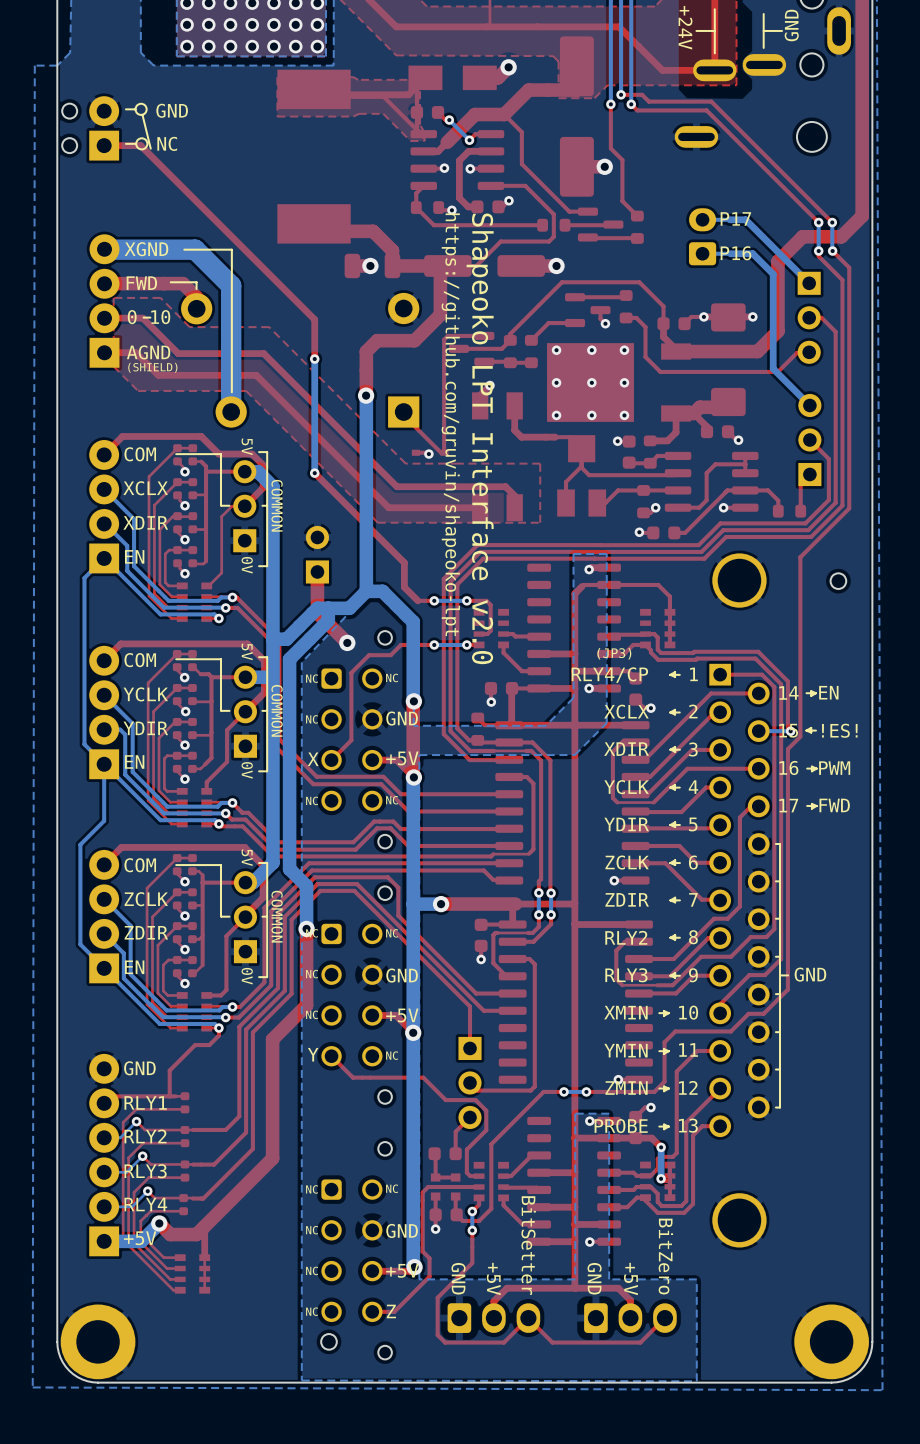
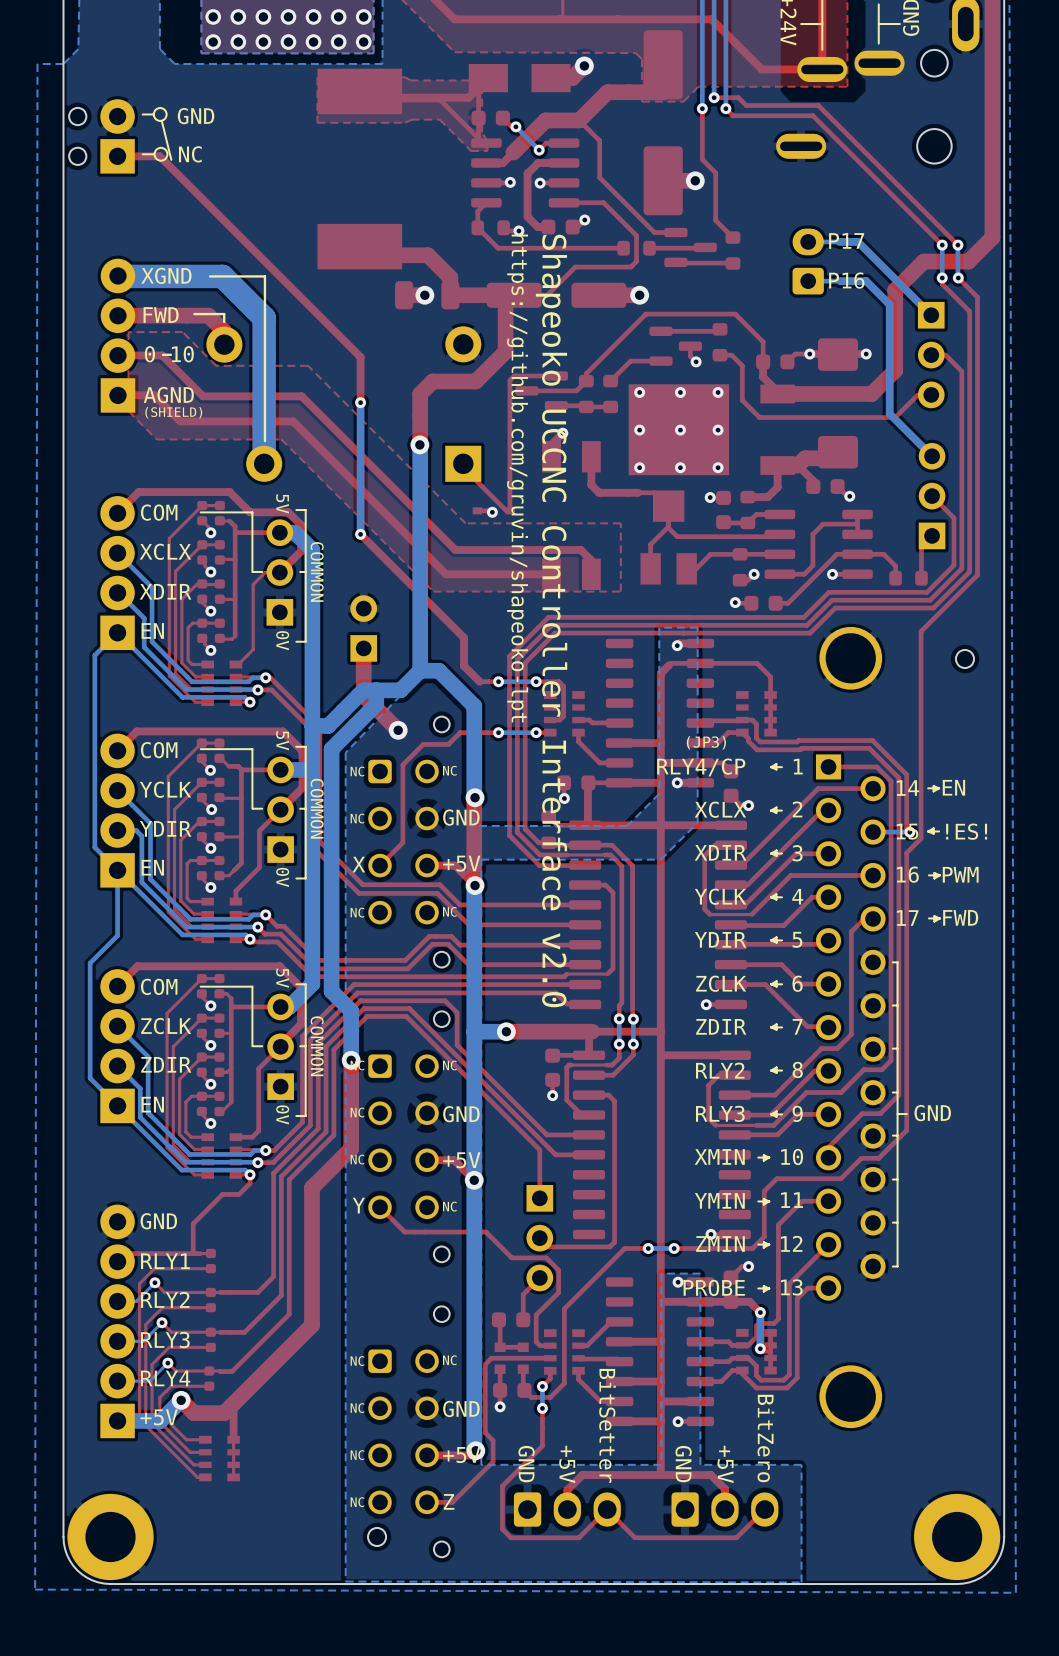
text: Shapeoko LPT Interface v2.0 (480, 438) -> Shapeoko UCCNC Controller Interface v2.0 (551, 621)

